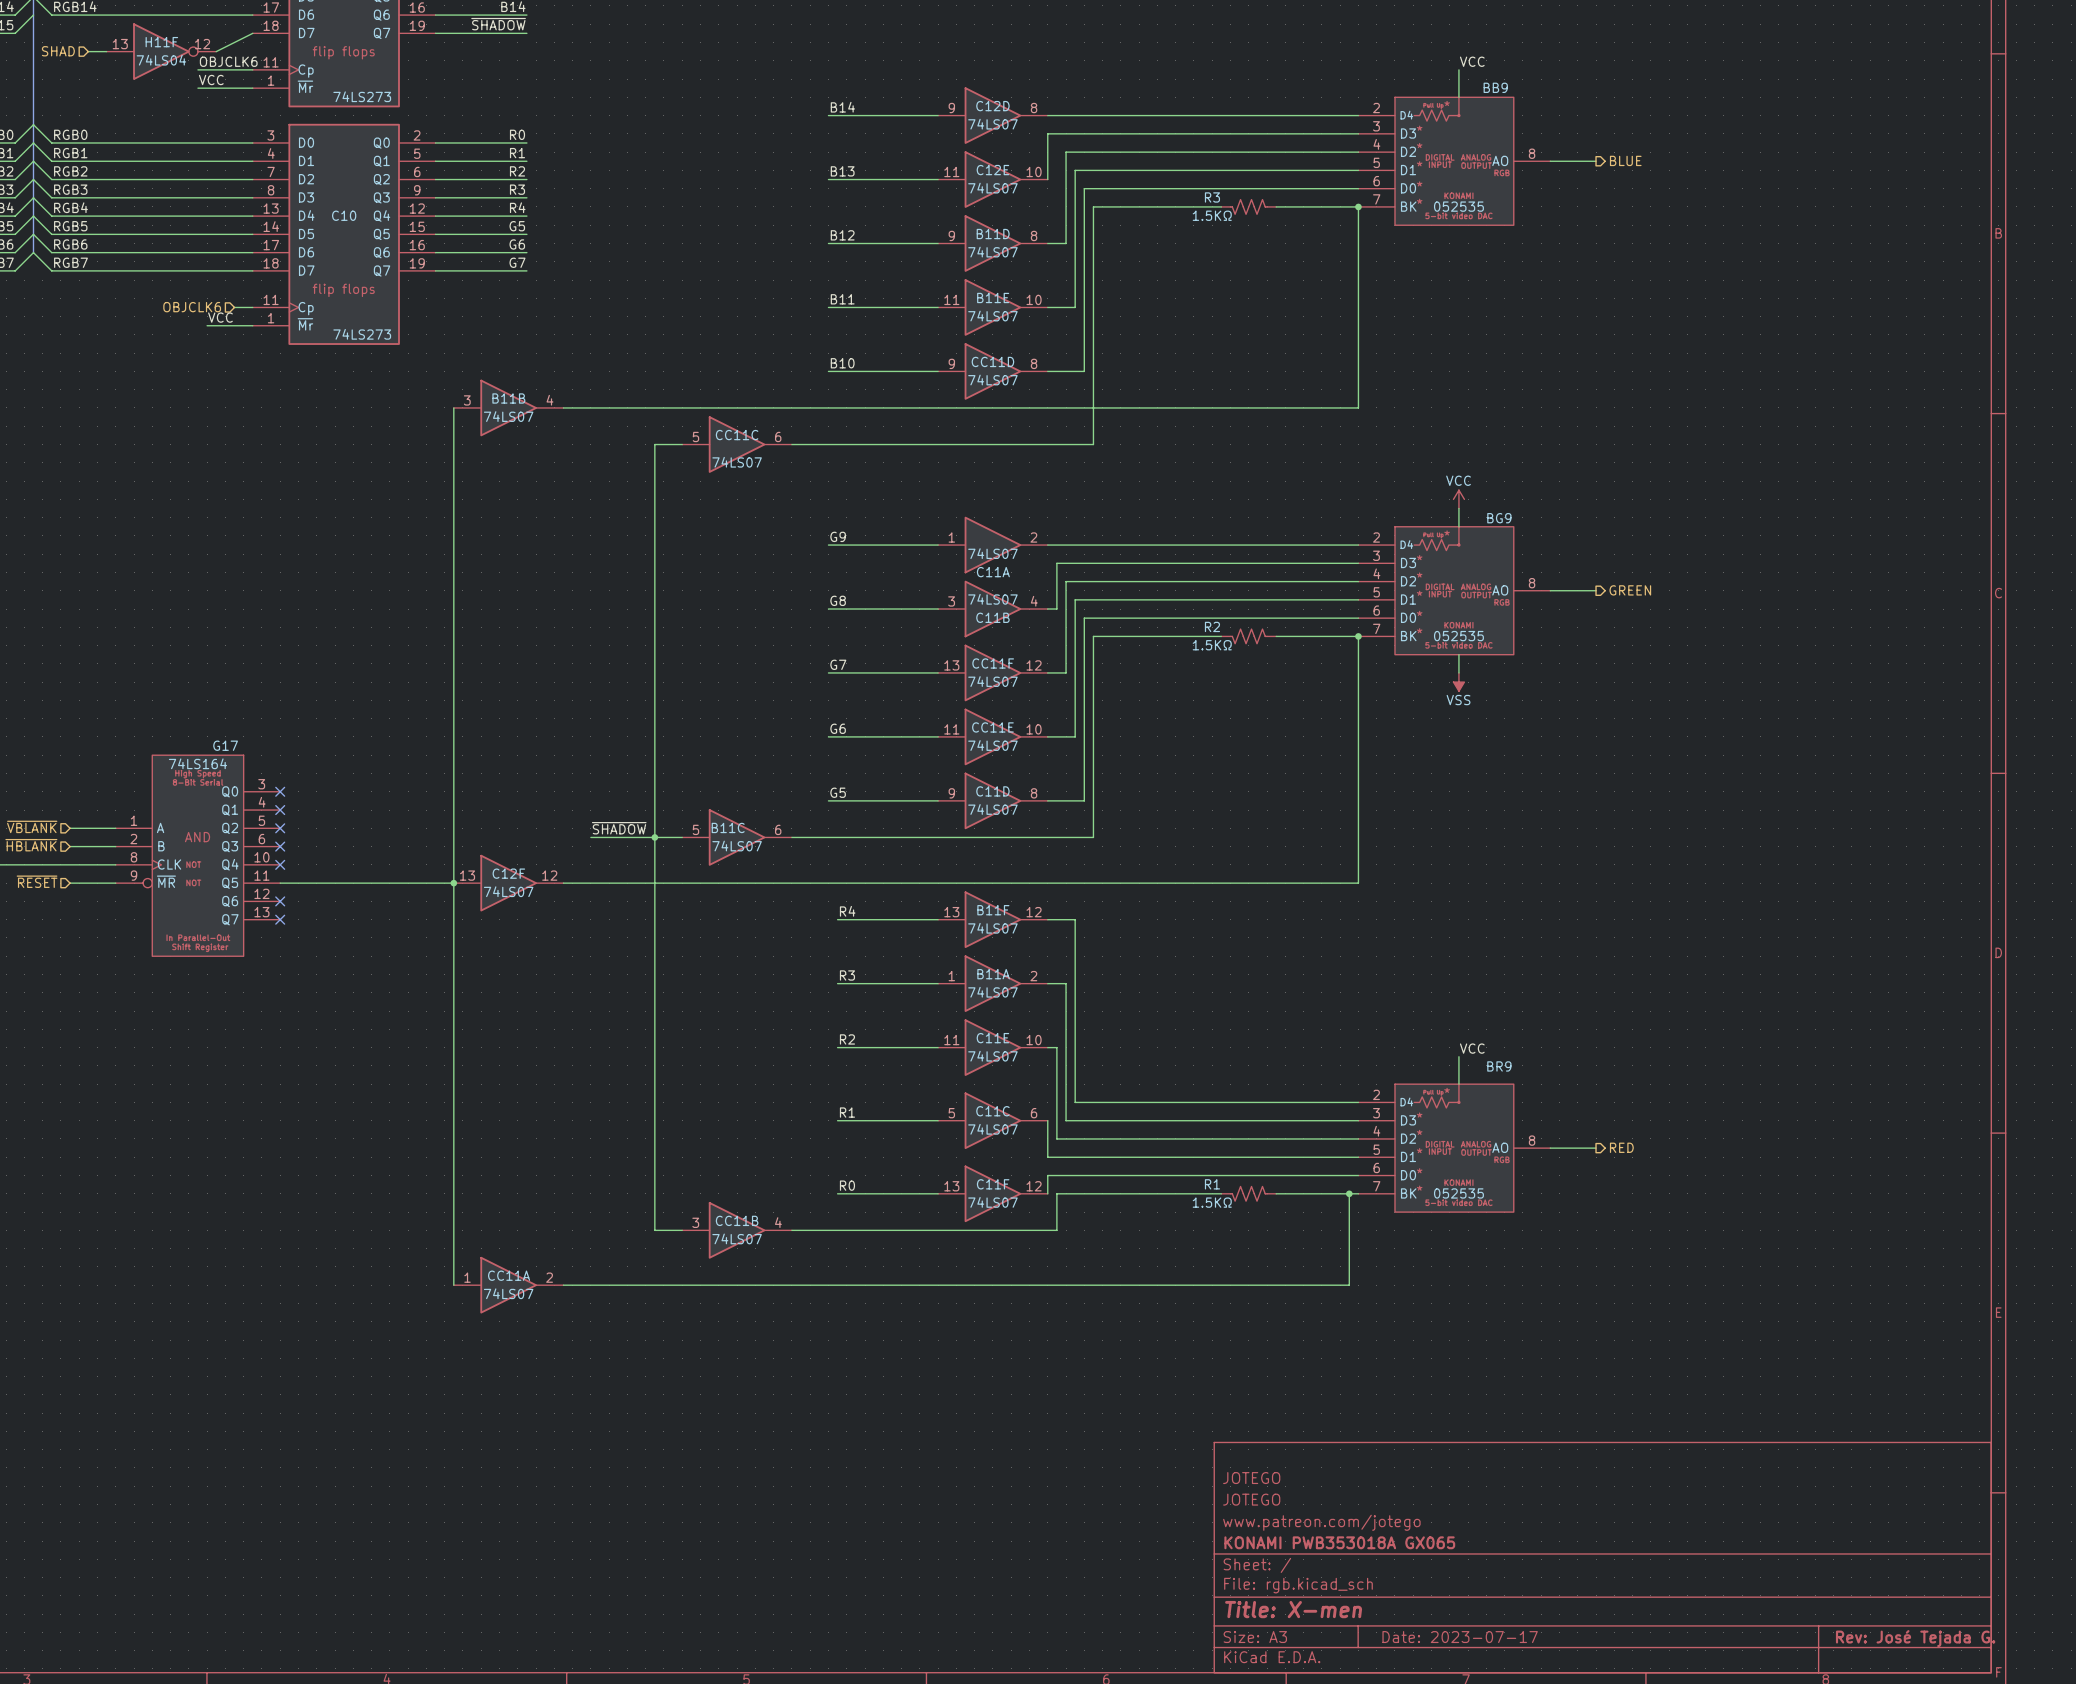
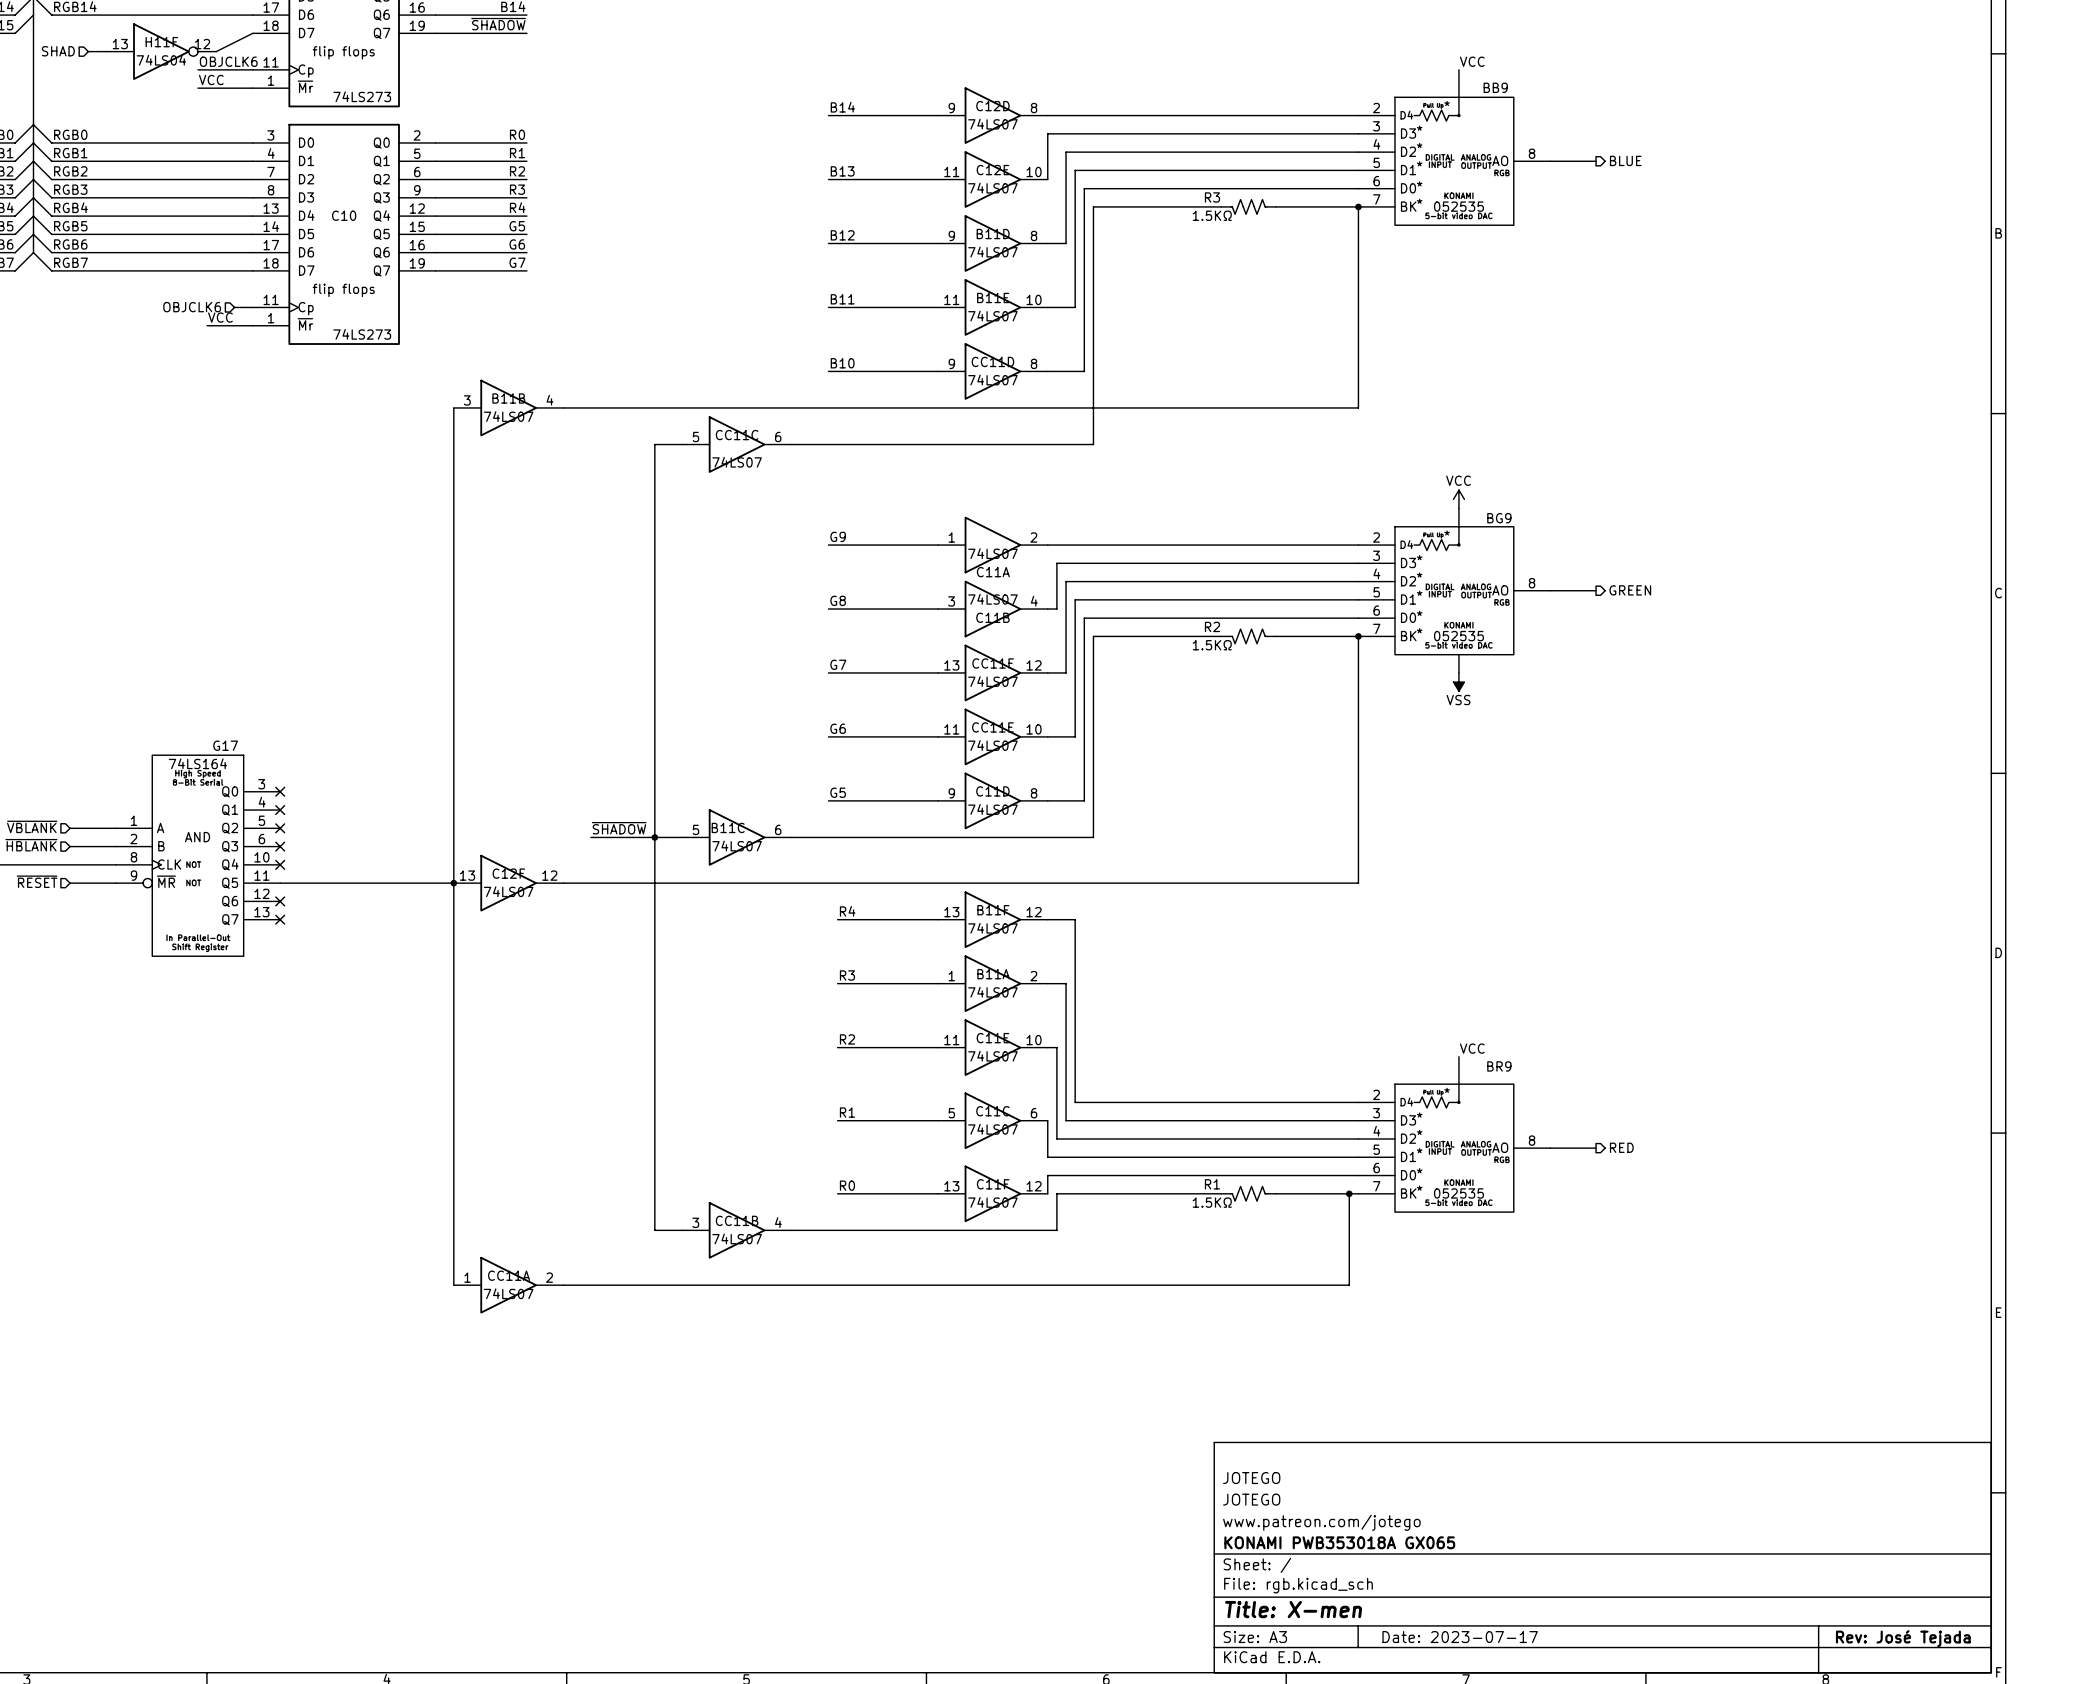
title block: Rev: José Tejada G. (1915, 1638) -> Rev: José Tejada (1903, 1638)

